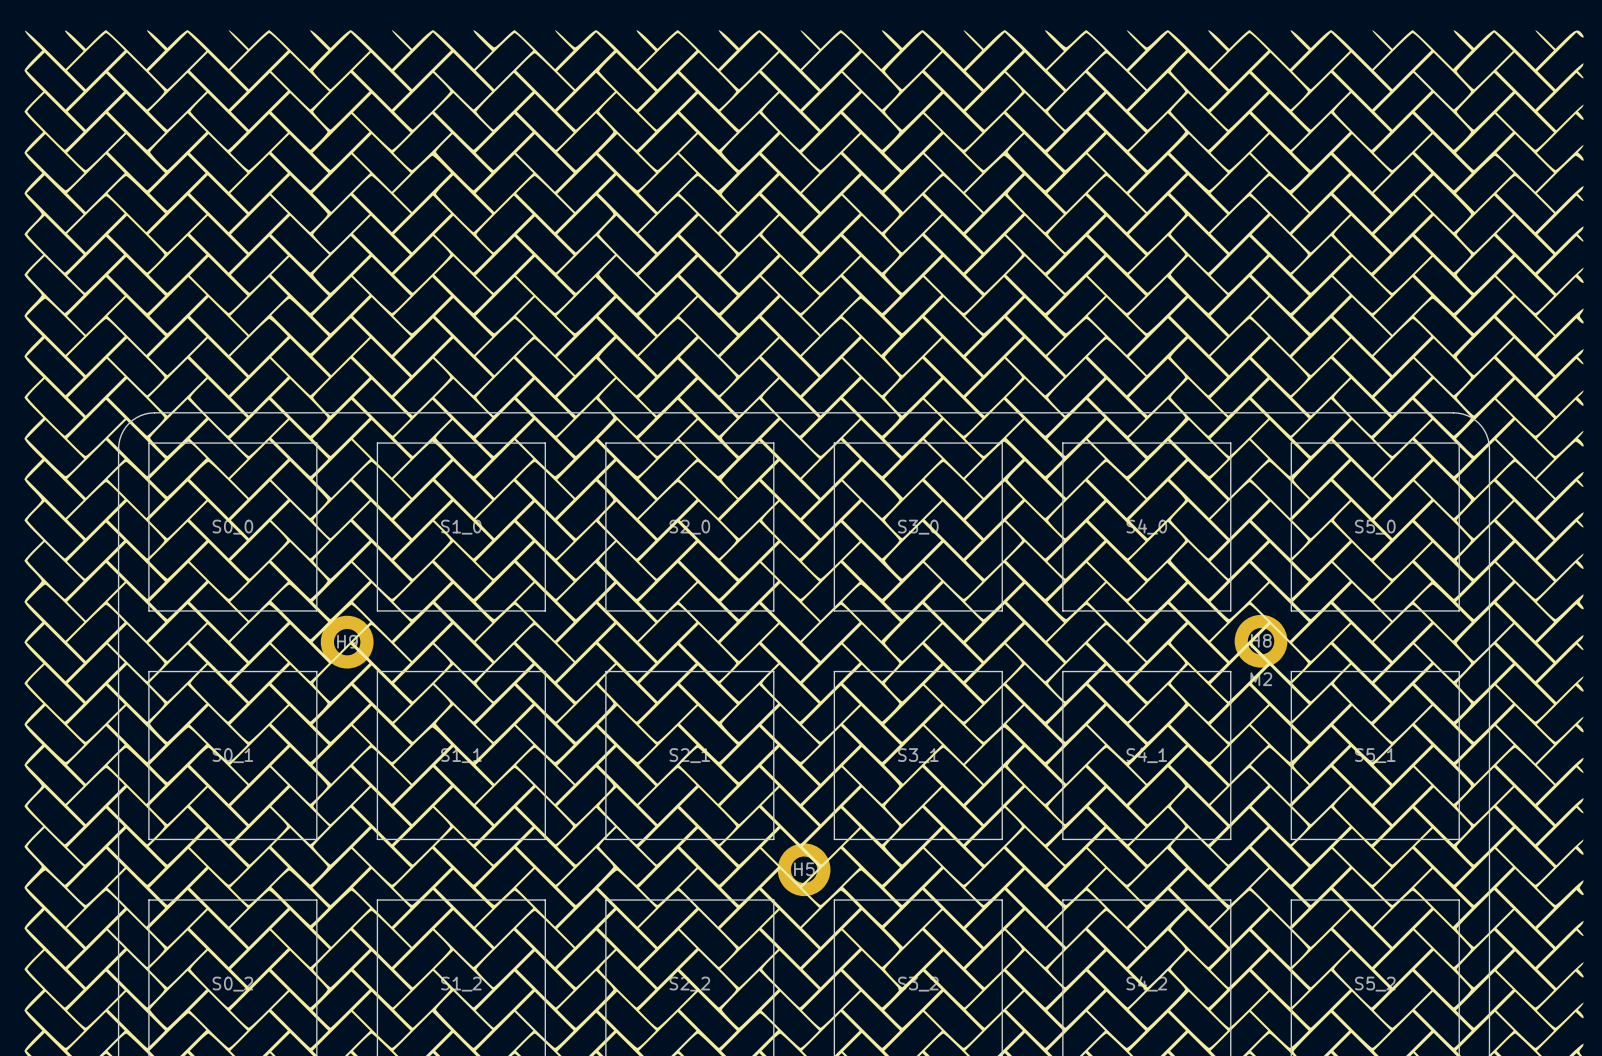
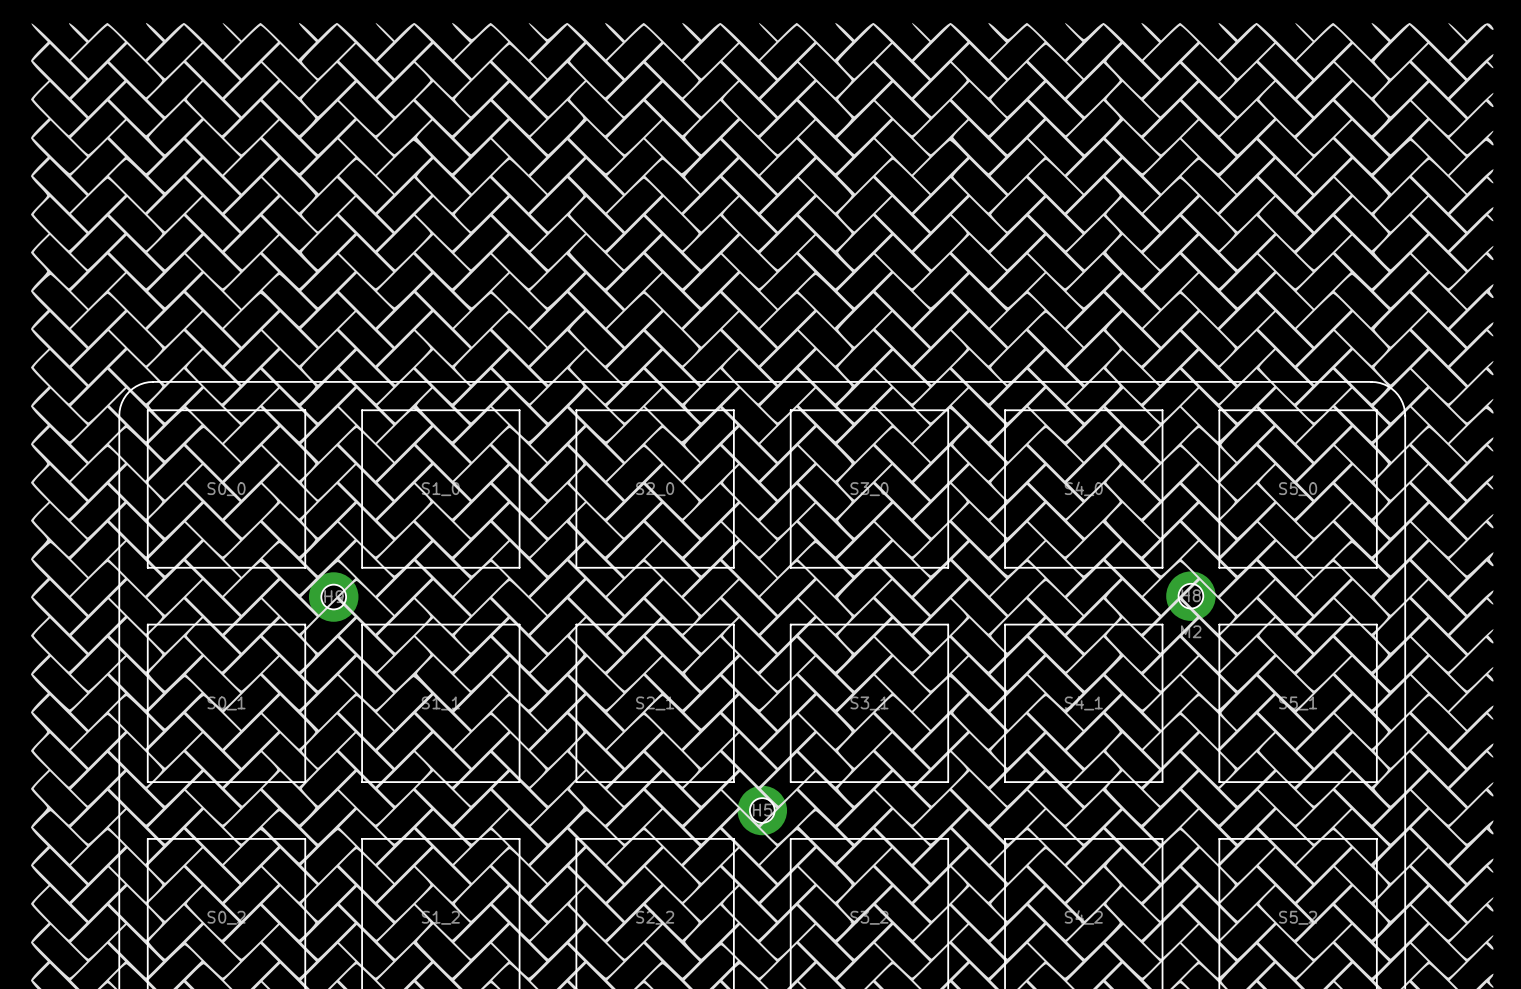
round board edge: none -> [1178, 583, 1204, 609]
round board edge: none -> [321, 584, 347, 610]
round board edge: none -> [749, 797, 775, 824]

